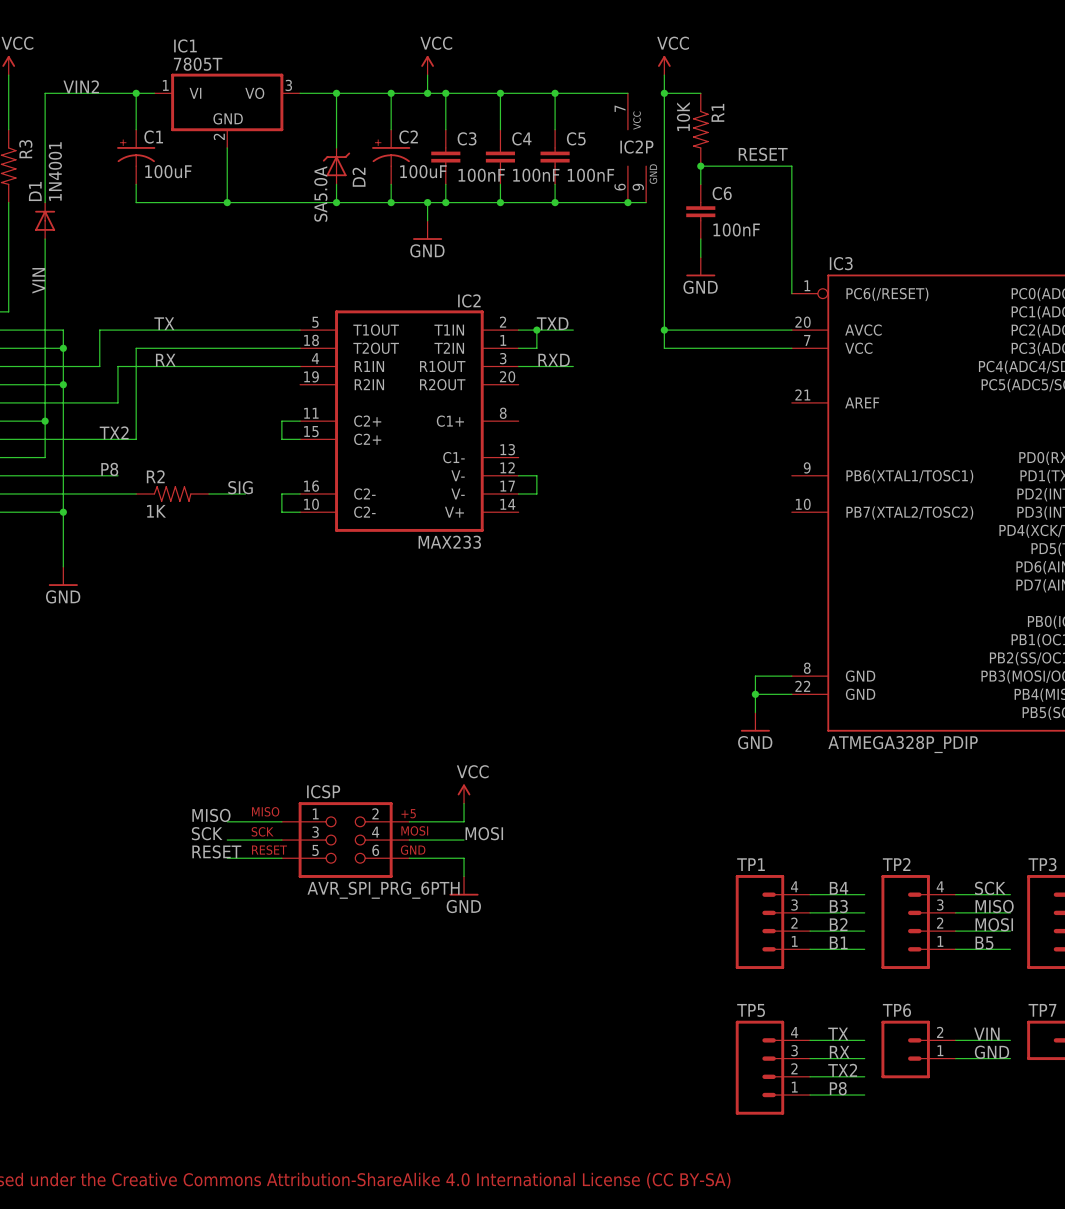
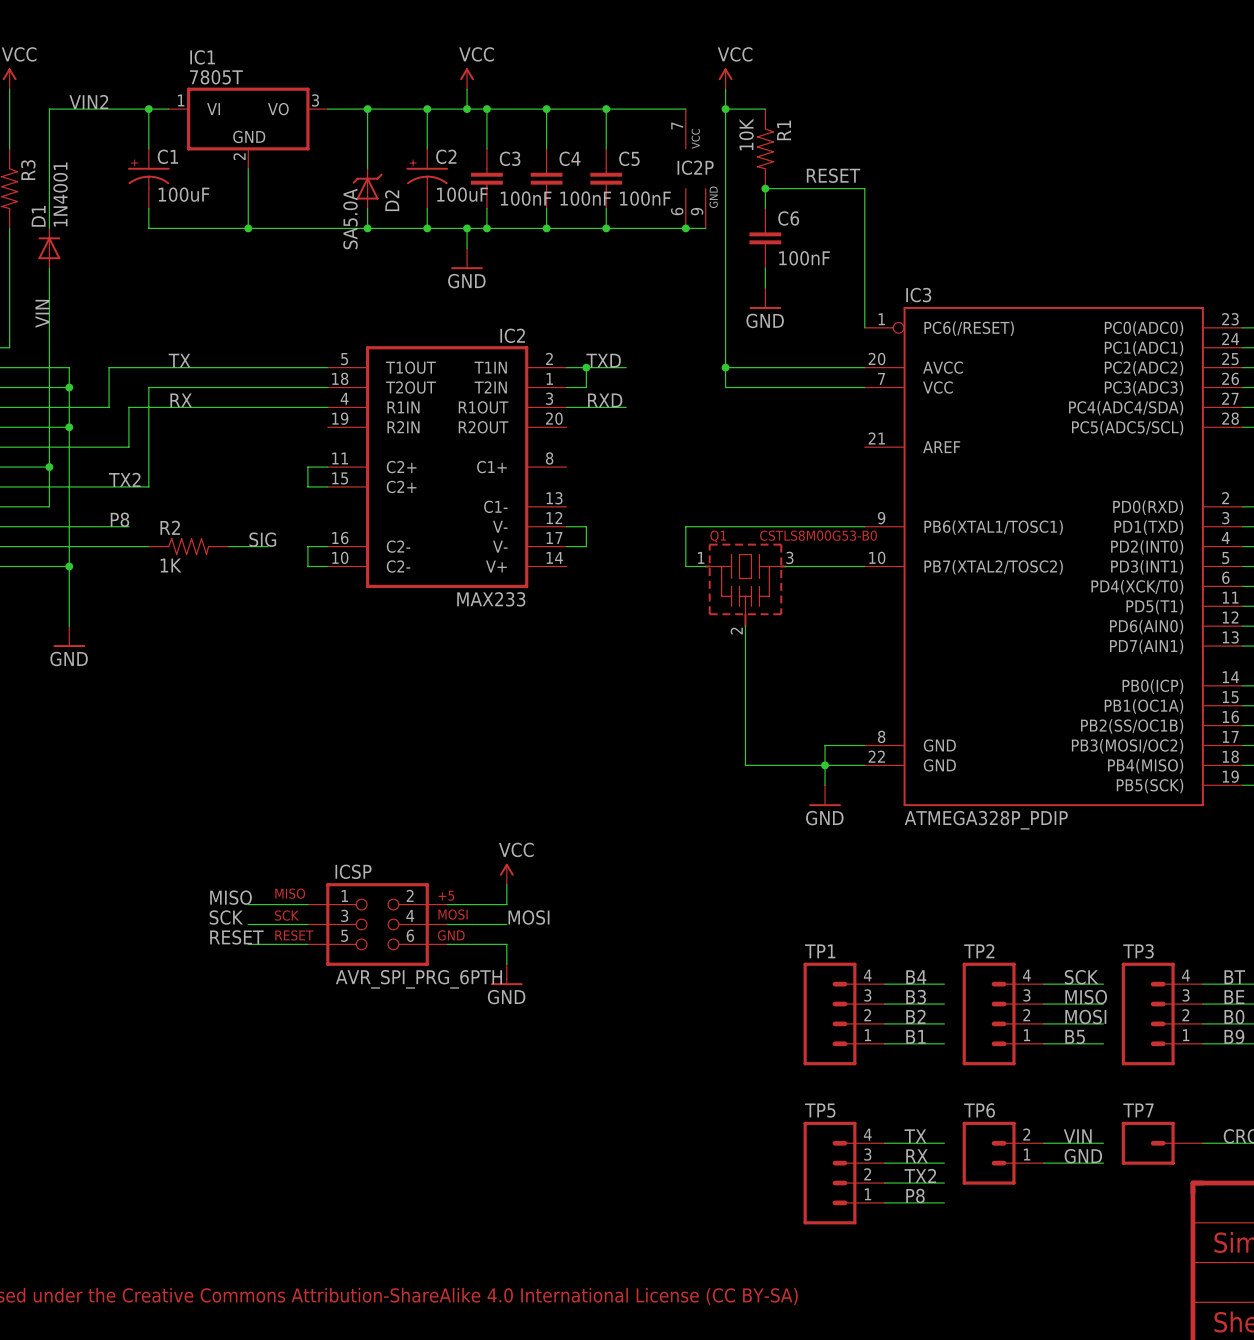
wire: none -> (864, 526) (685, 526) (685, 566) (705, 566)
wire: none -> (785, 566) (864, 566)
Q1: none -> CSTLS8M00G53-B0 (745, 585)
wire: none -> (745, 626) (745, 765) (825, 765)

